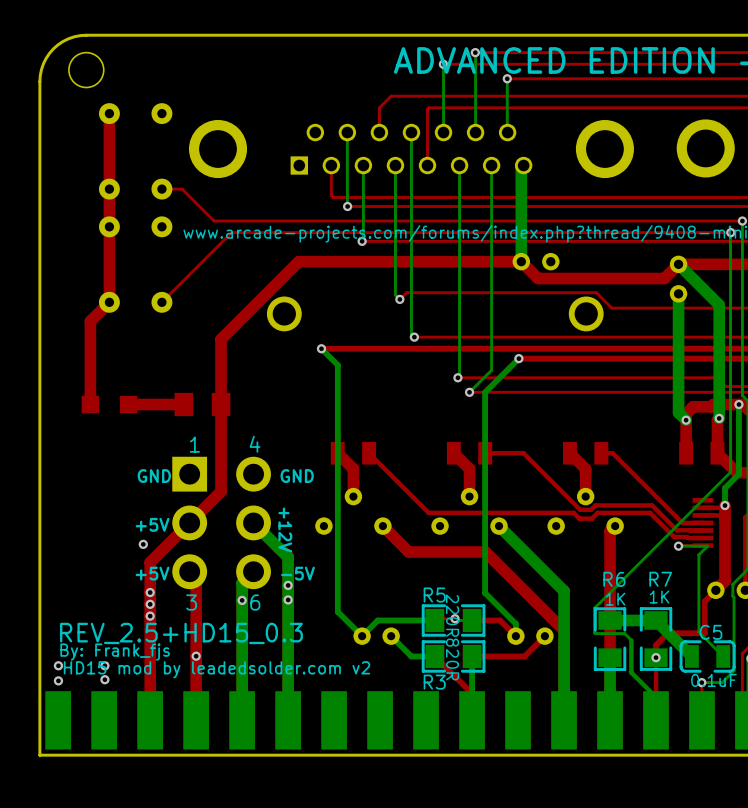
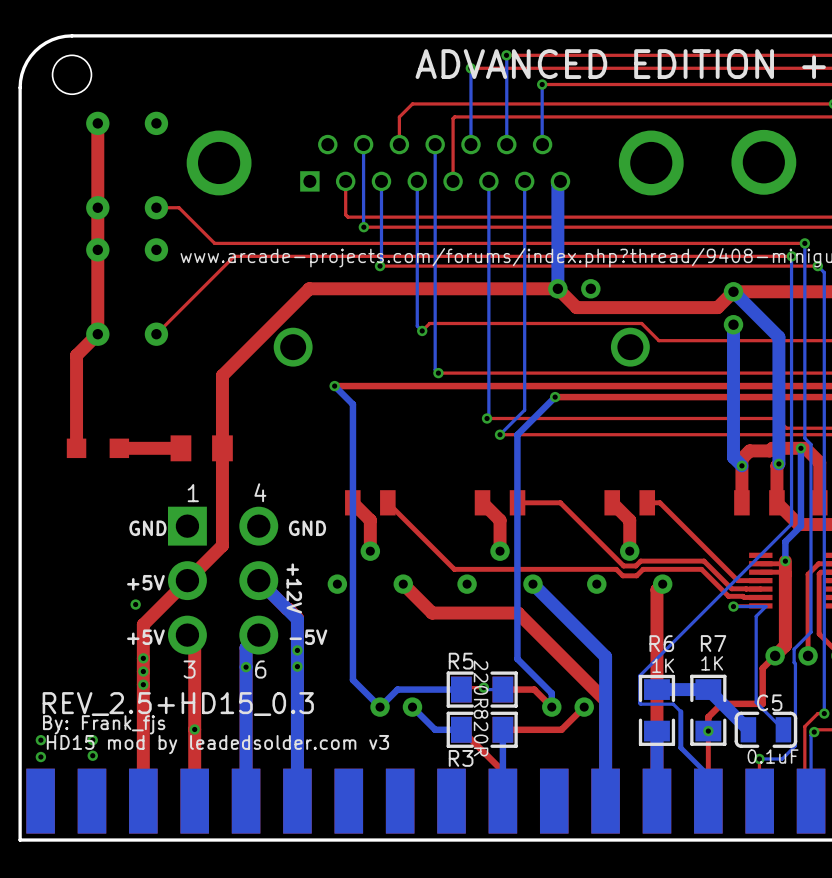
text: HD15 mod by leadedsolder.com v2 (216, 669) -> HD15 mod by leadedsolder.com v3 (217, 744)

